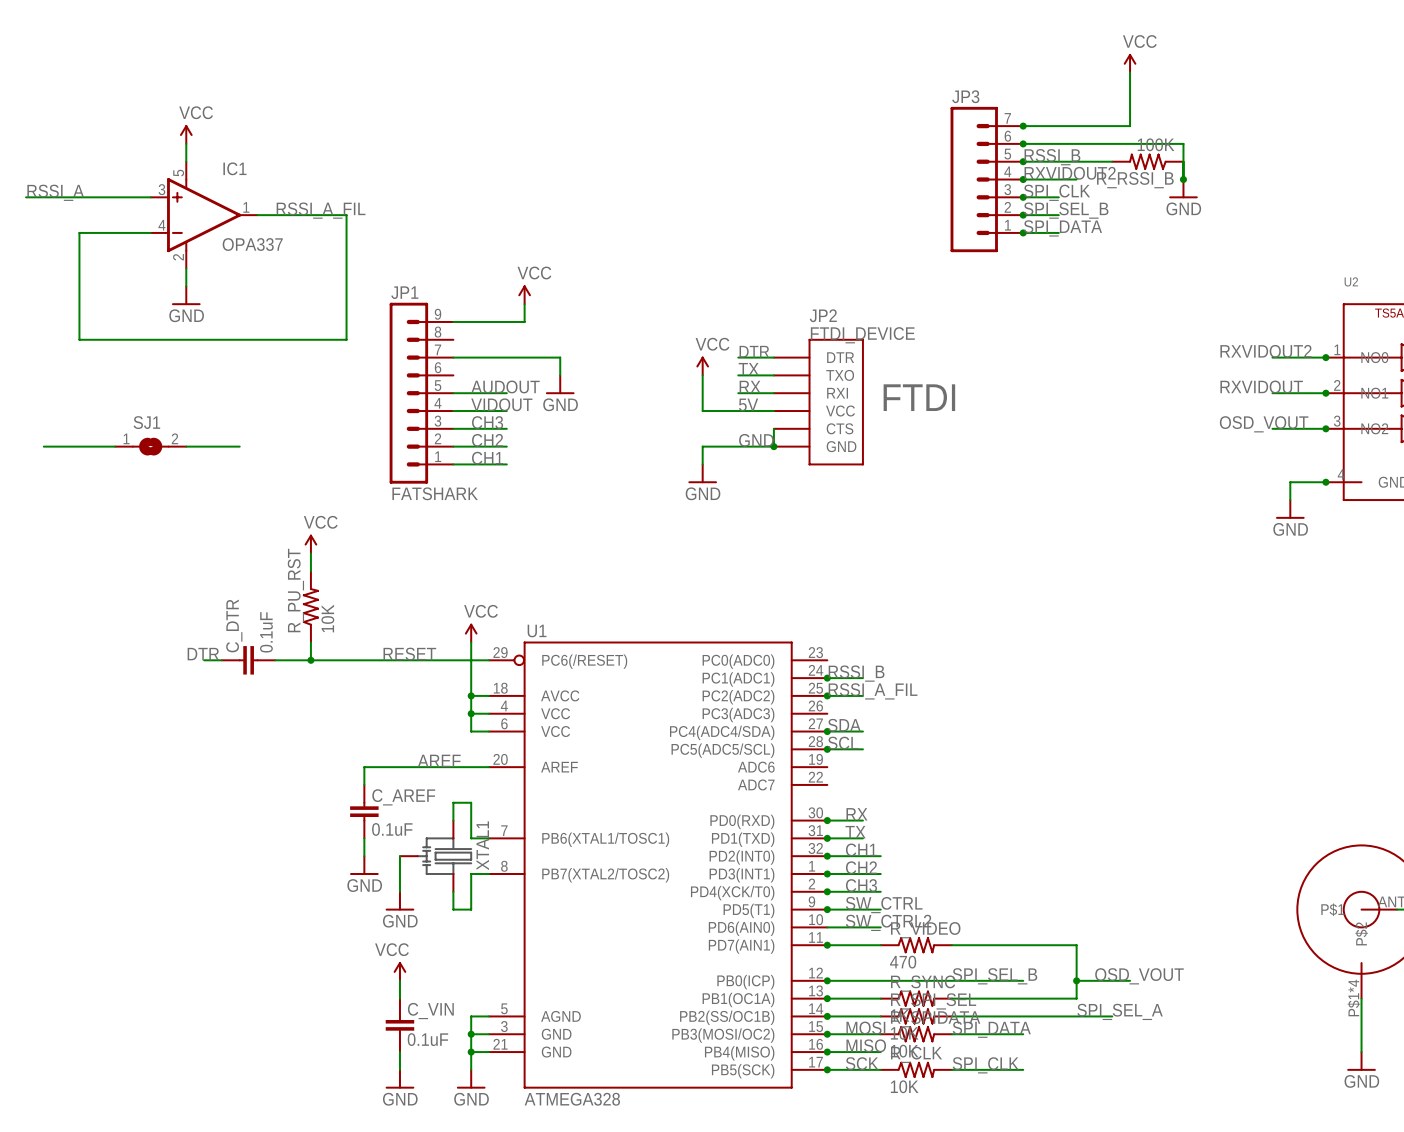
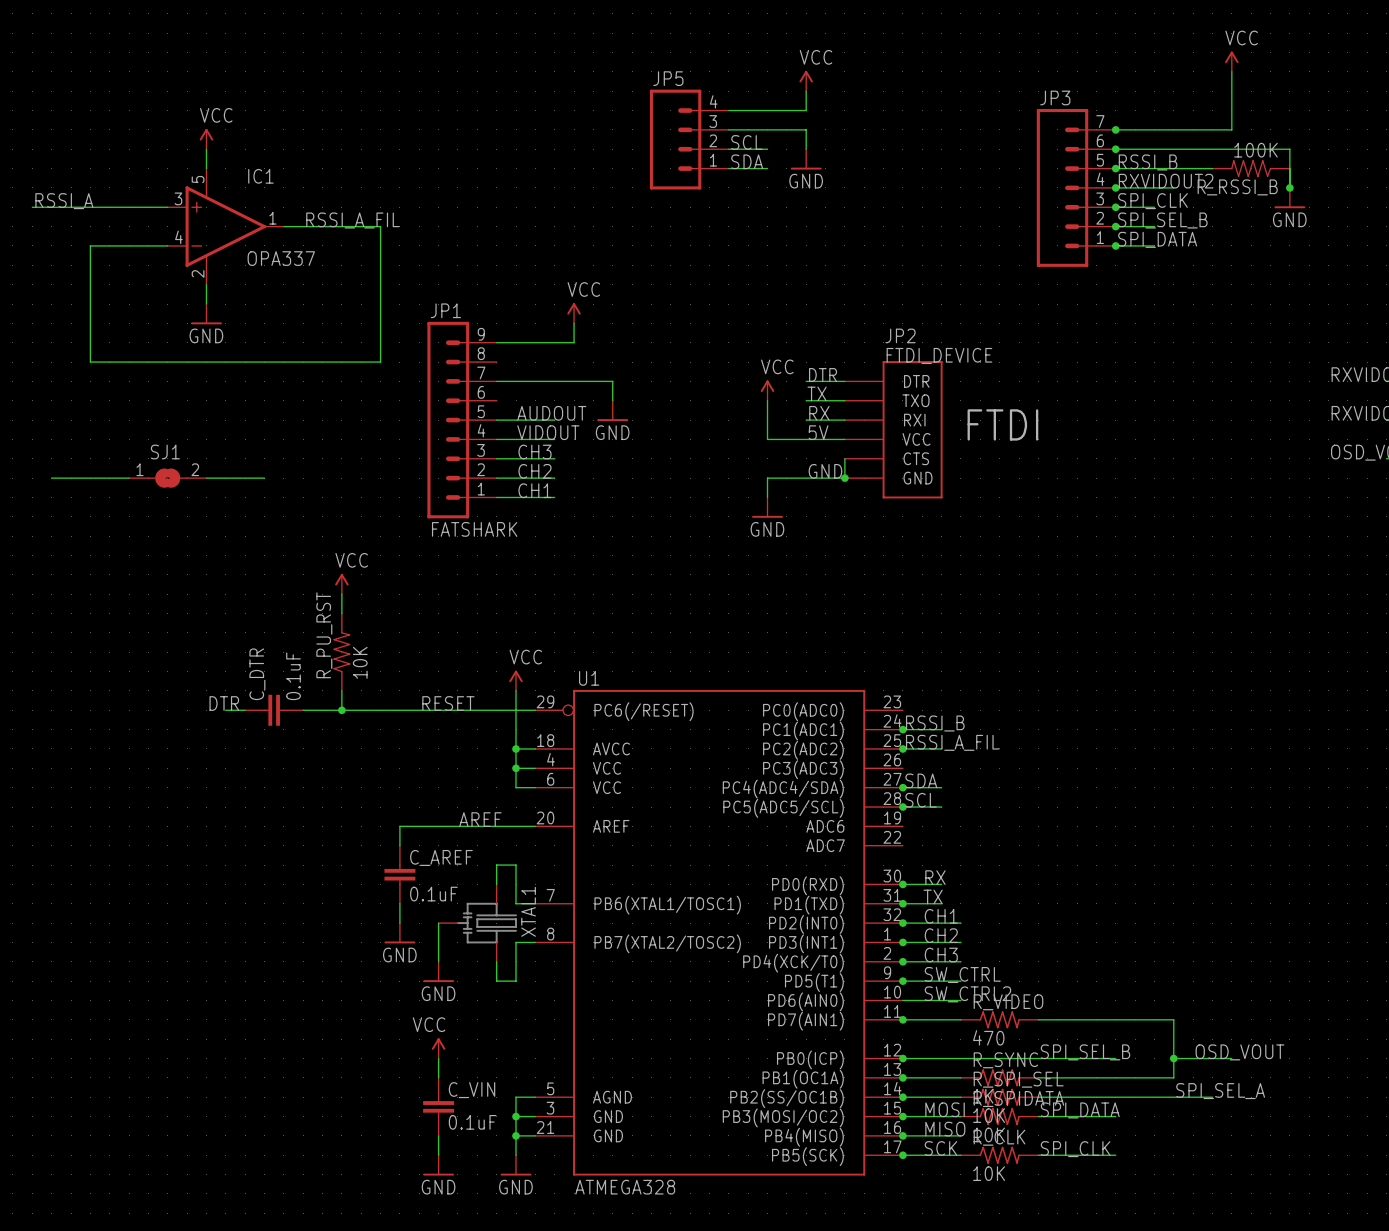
power symbol: none -> VCC (806, 81)
wire: none -> (806, 91) (806, 110) (728, 110)
wire: none -> (728, 129) (806, 129) (806, 149)
JP5: none -> (689, 139)
label: none -> SCL (746, 142)
wire: none -> (728, 149) (767, 149)
power symbol: none -> GND (806, 159)
label: none -> SDA (747, 161)
wire: none -> (728, 168) (767, 168)

